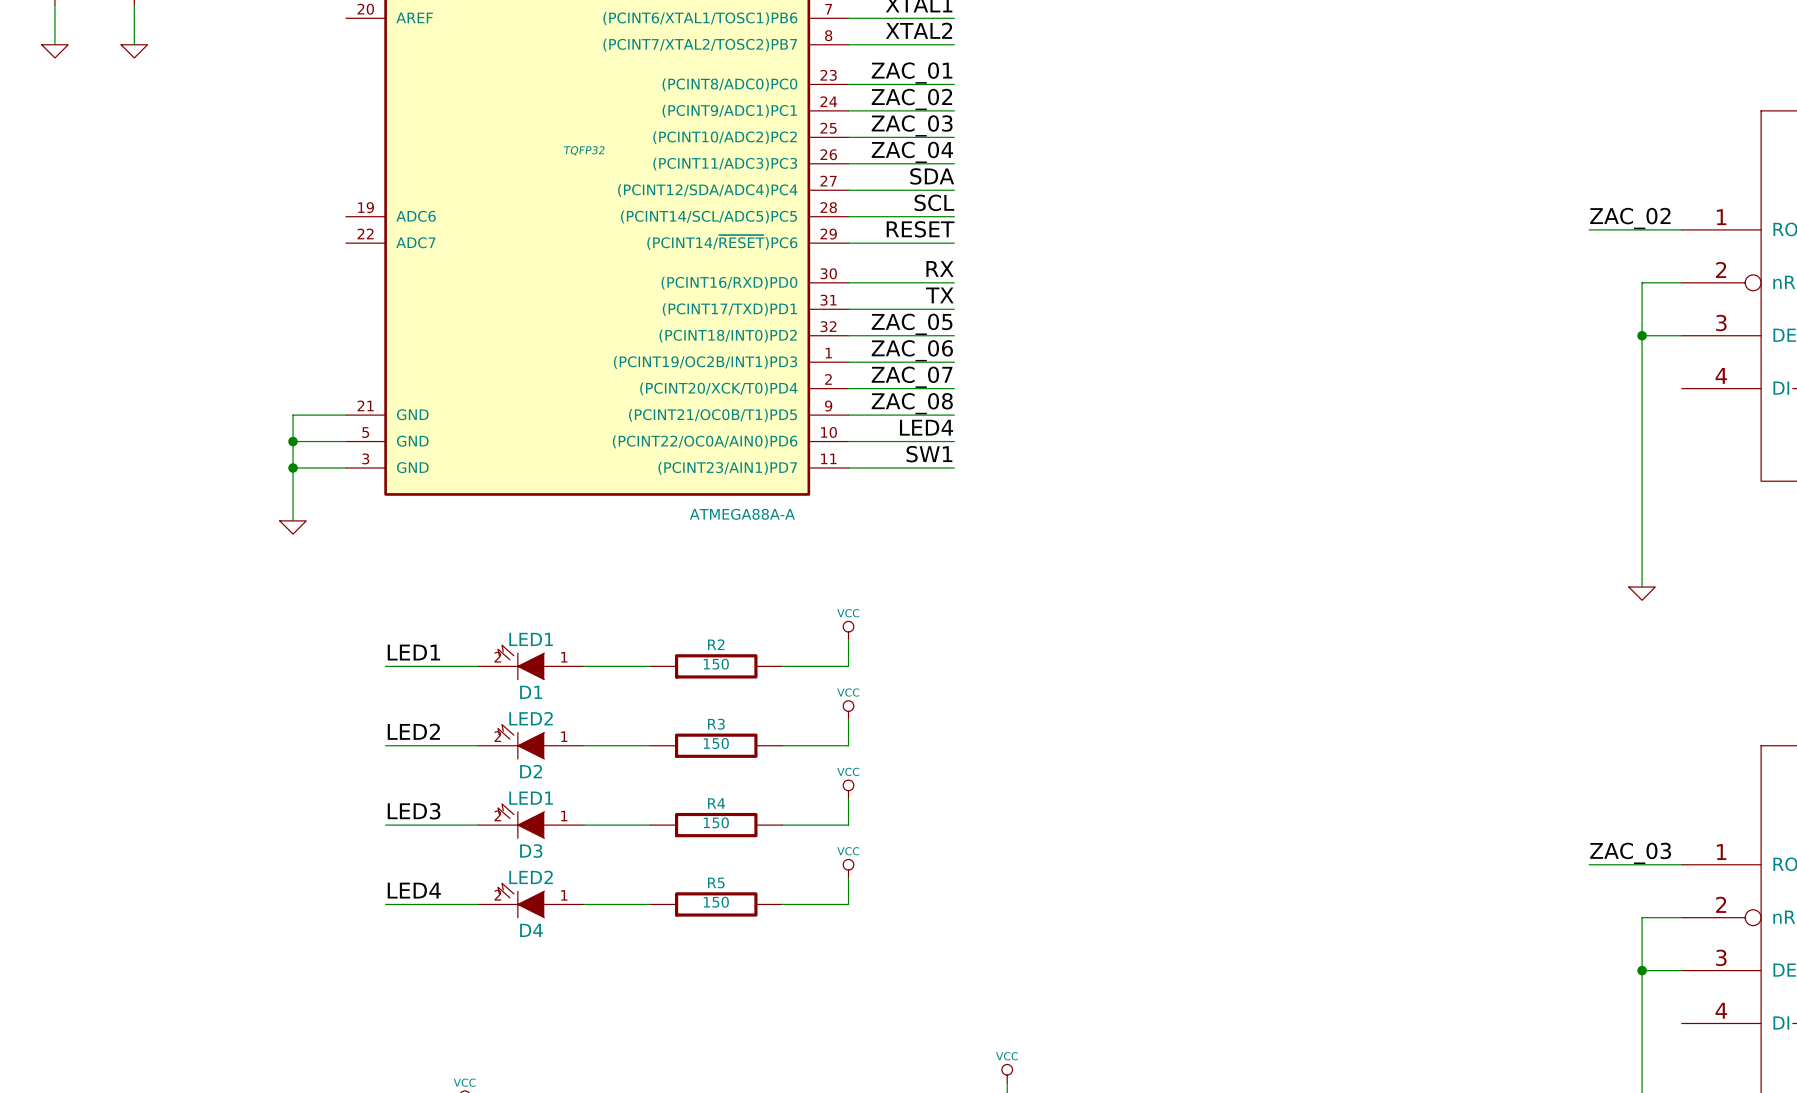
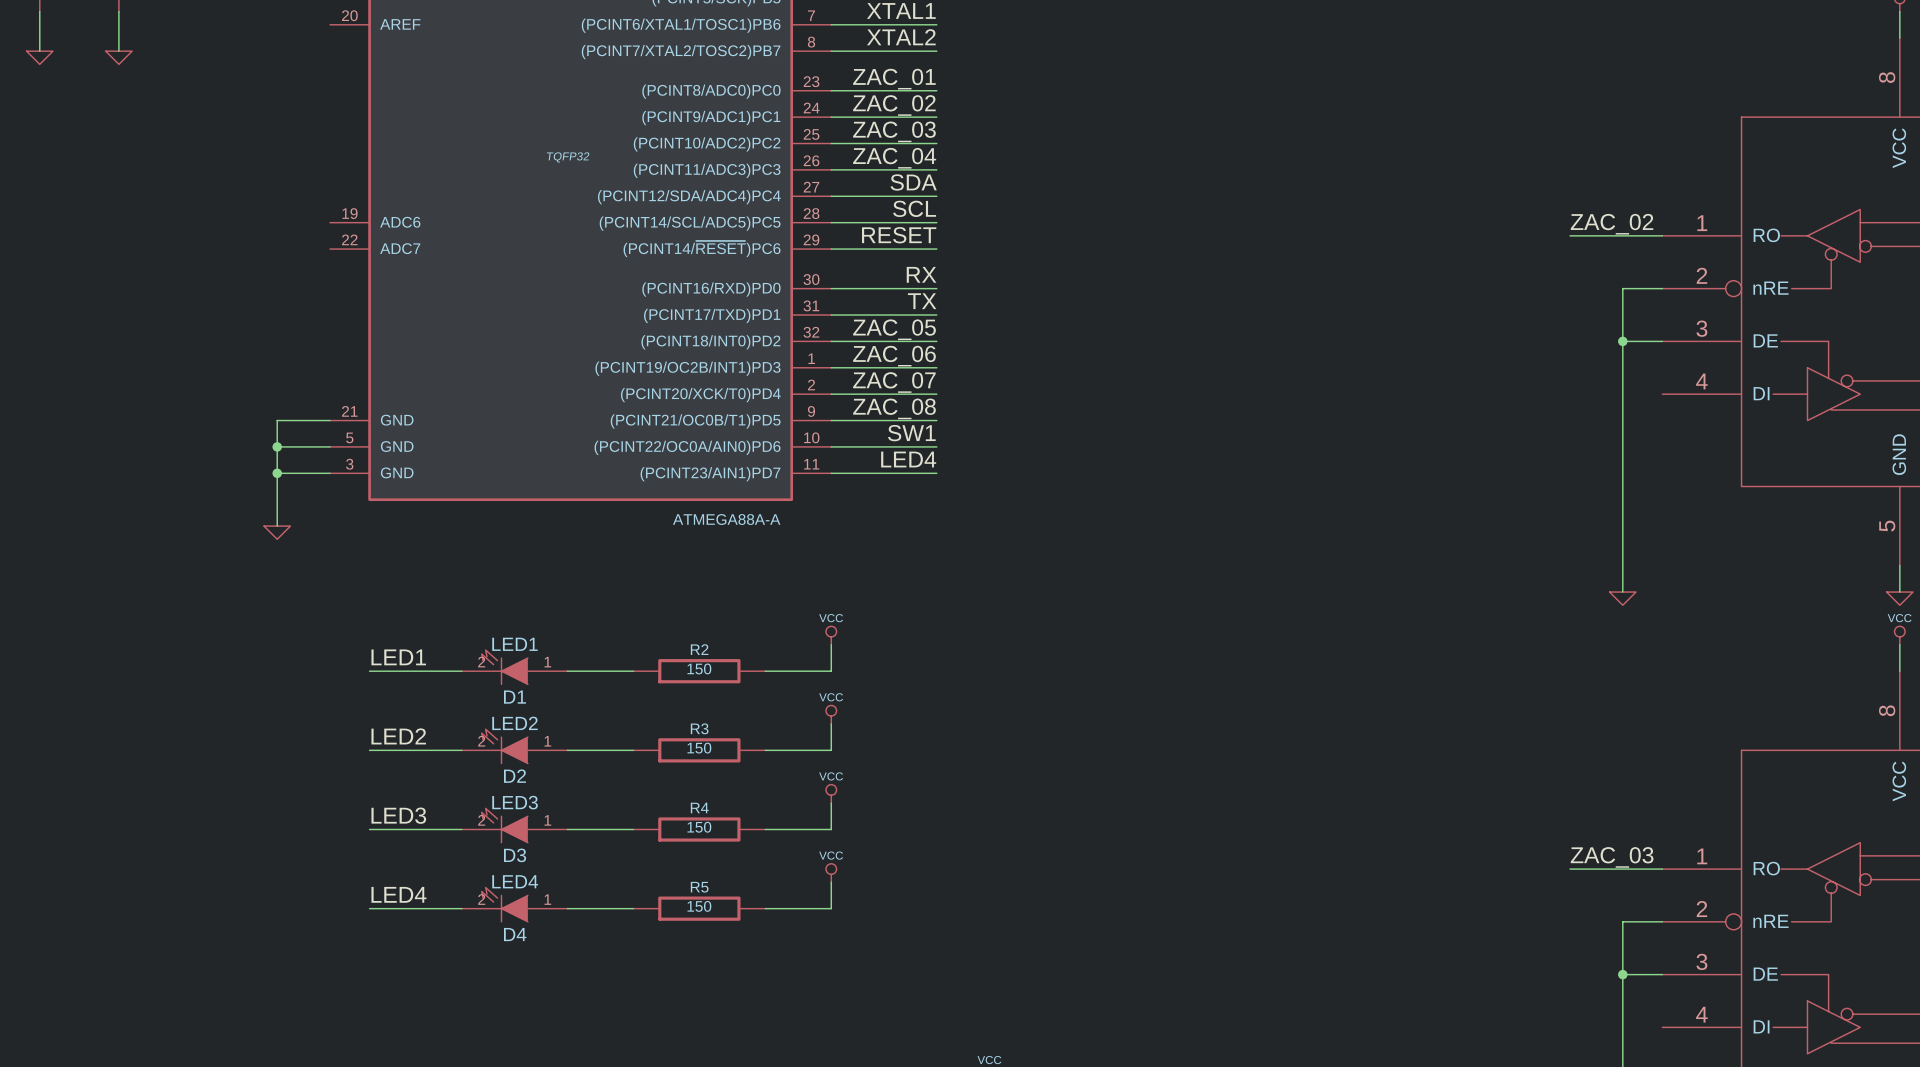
label: LED4 (926, 427) -> SW1 (911, 433)
label: SW1 (929, 454) -> LED4 (908, 459)
D3 value: LED1 (531, 798) -> LED3 (515, 802)
D4 value: LED2 (531, 877) -> LED4 (515, 881)

